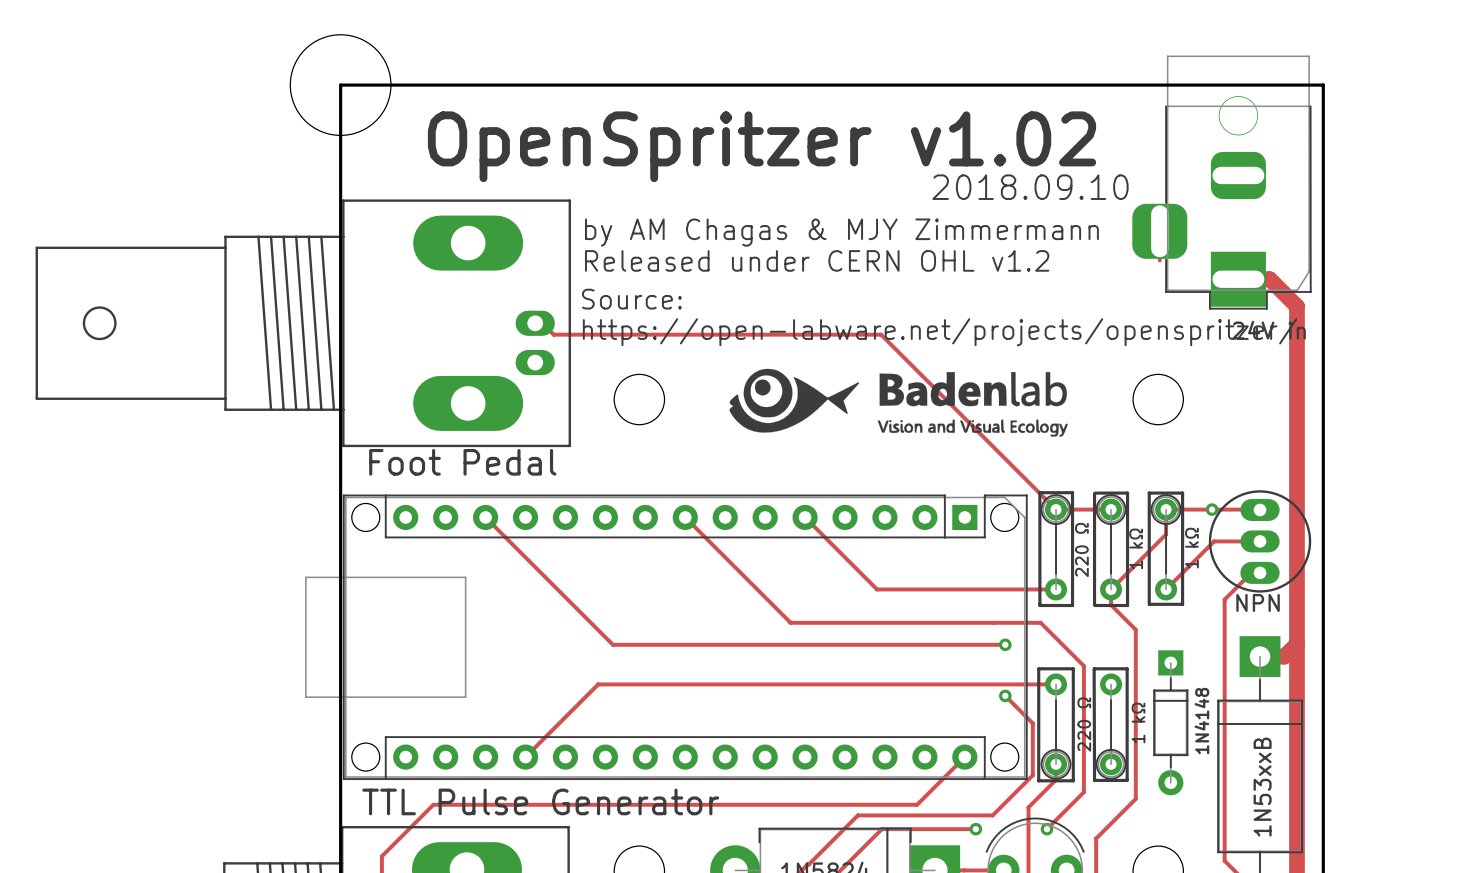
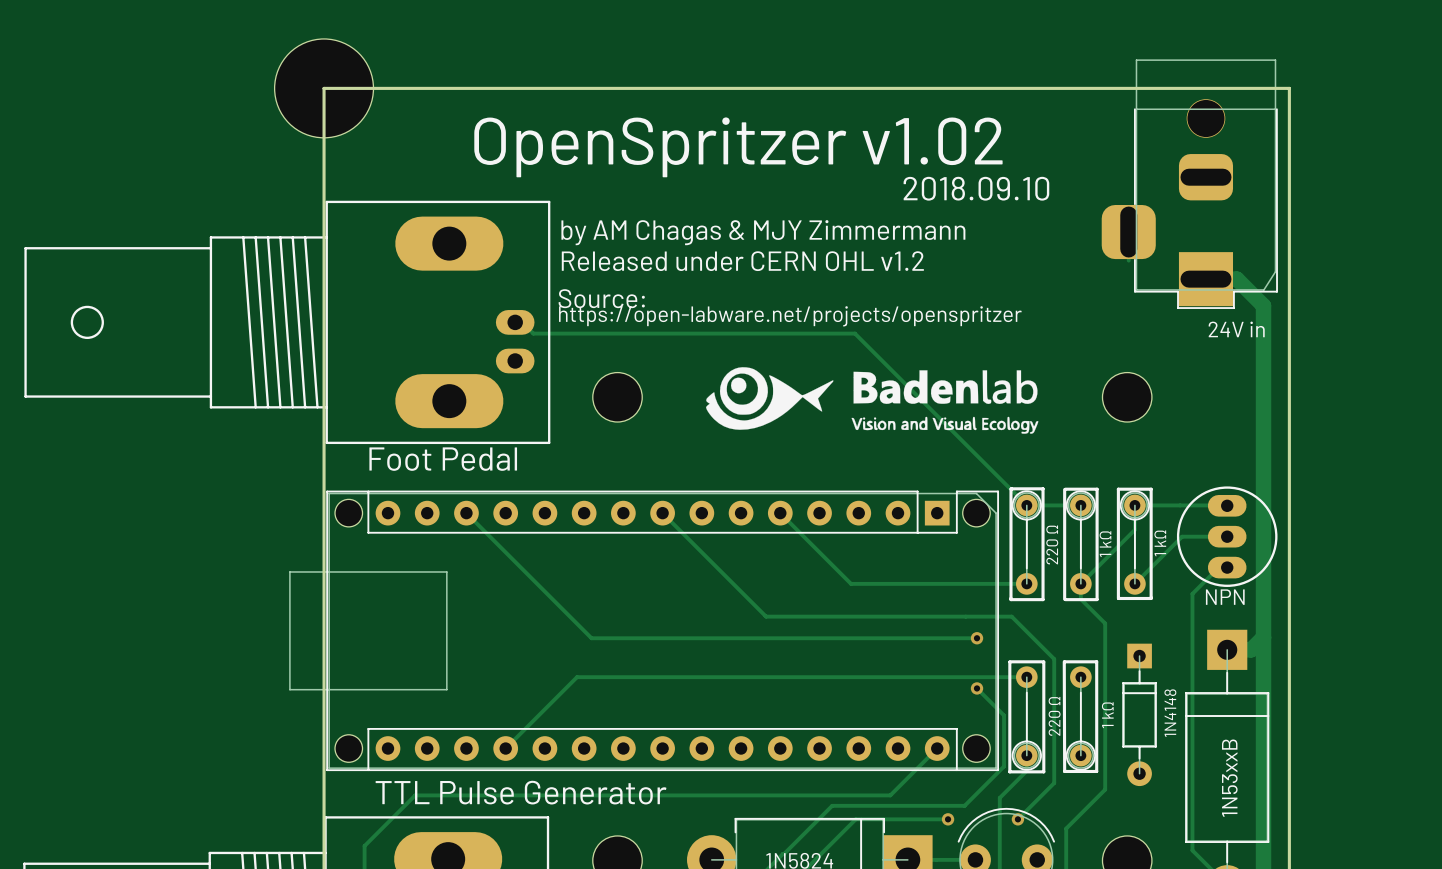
text: https://open-labware.net/projects/openspritzer/ (940, 332) -> https://open-labware.net/projects/openspritzer (790, 316)
via: (1212, 509) -> none

